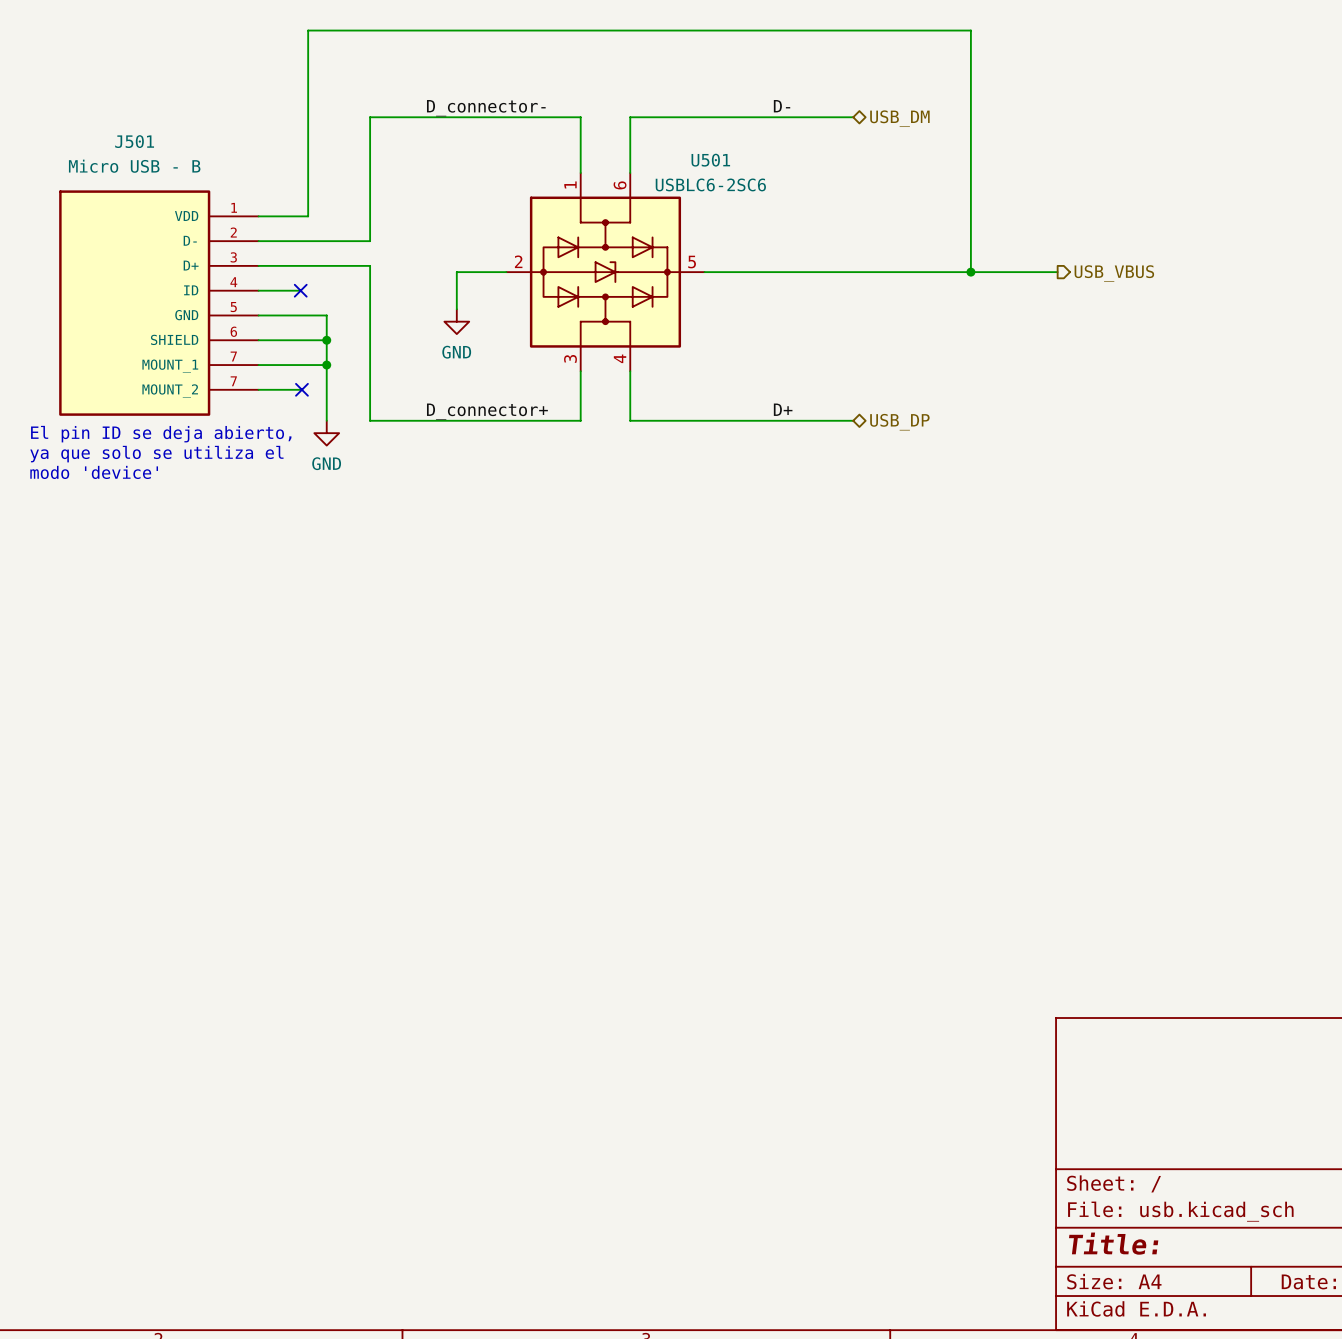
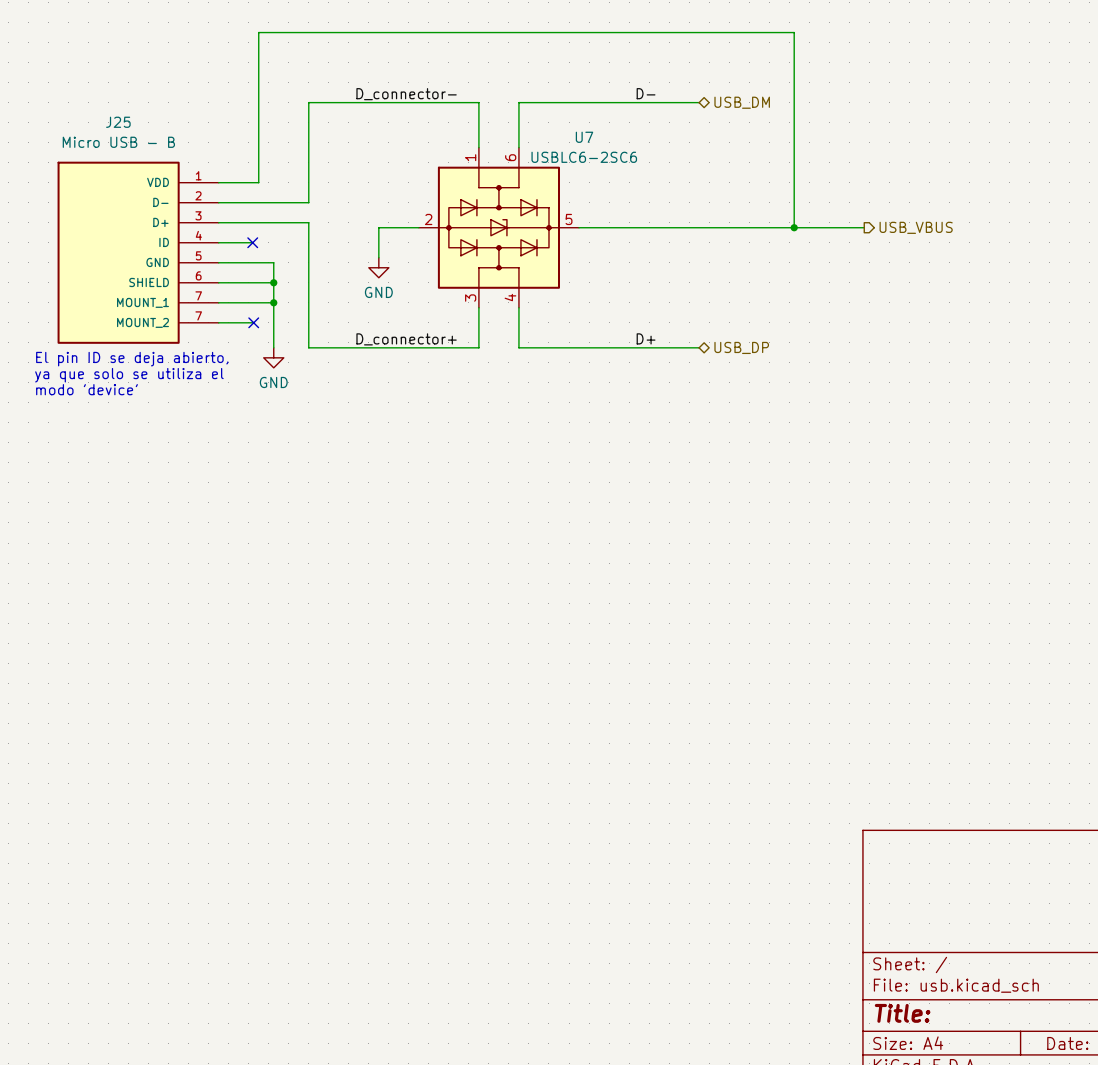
J501 name: J501 (134, 141) -> J25 (118, 122)
U501 name: U501 (710, 160) -> U7 (584, 137)

